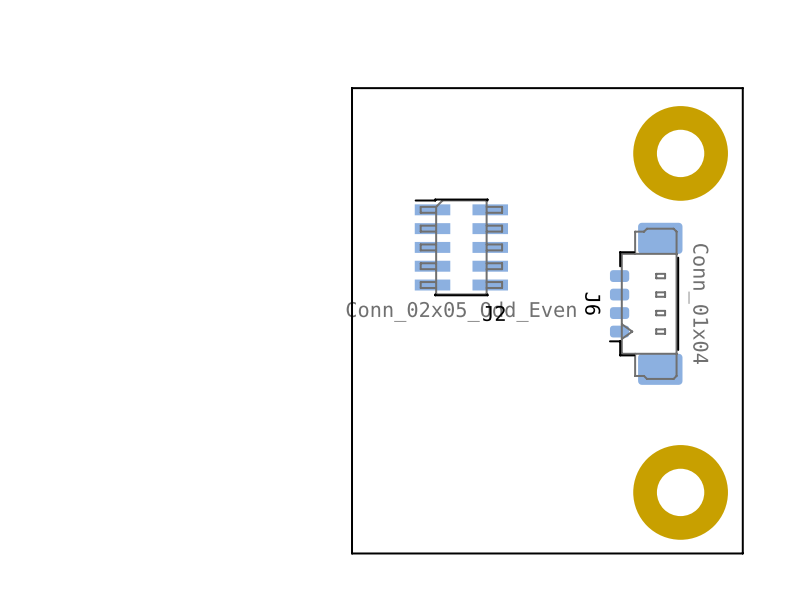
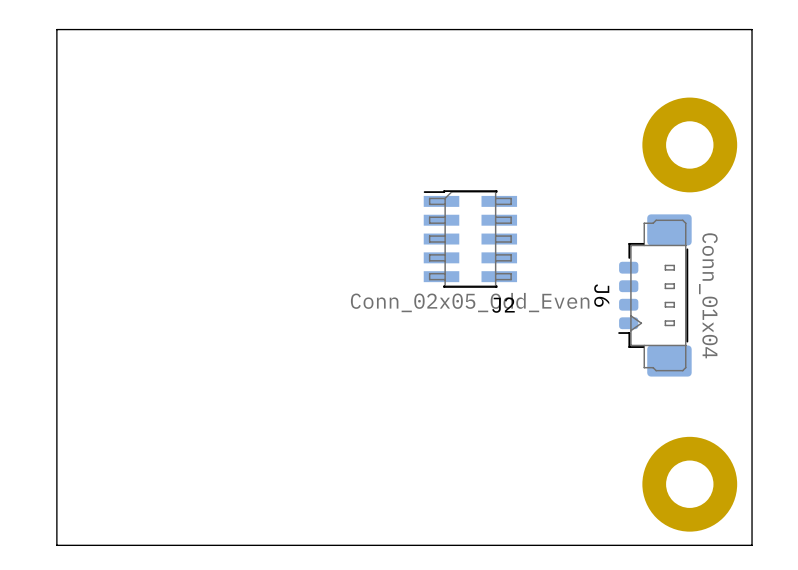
board edge: (742, 88) (352, 88) (352, 553) -> (752, 79) (752, 29) (56, 29) (56, 545) (360, 545)

